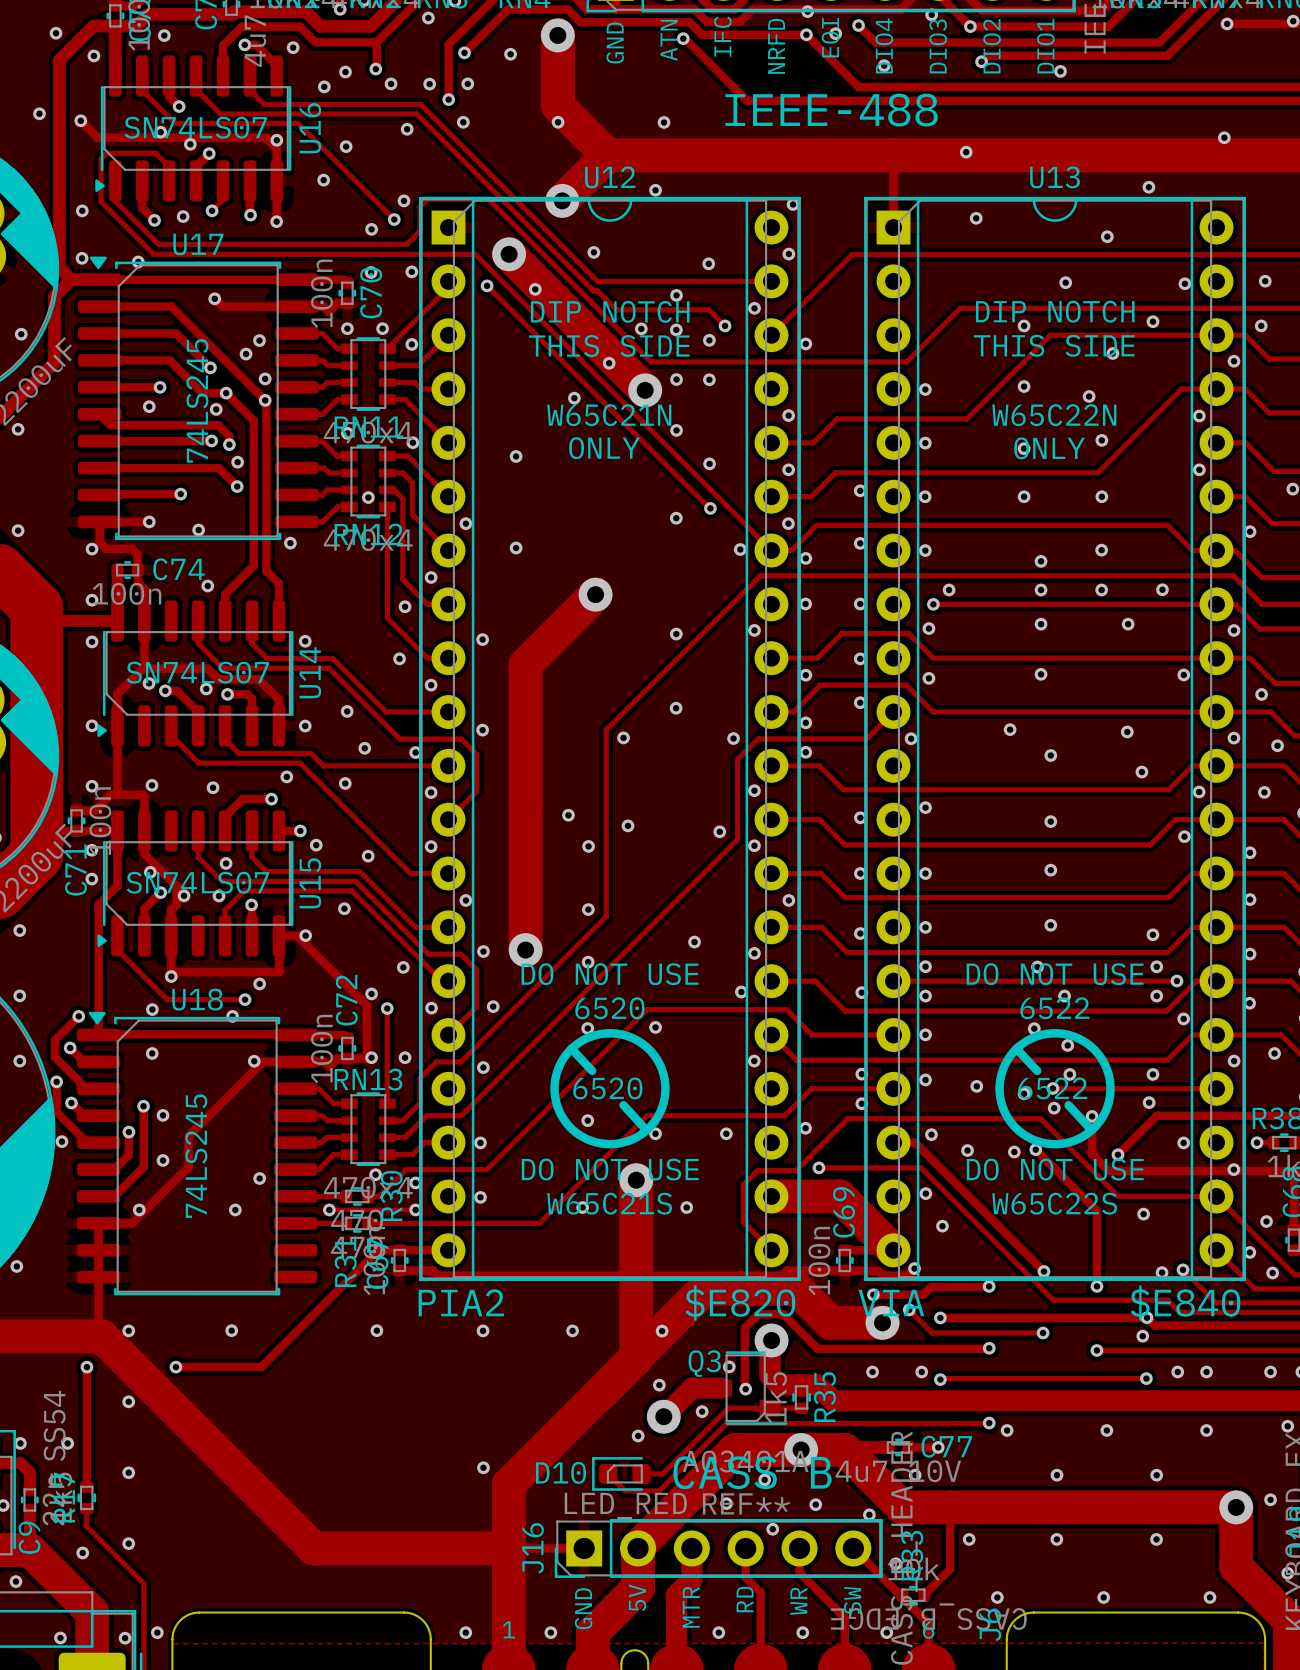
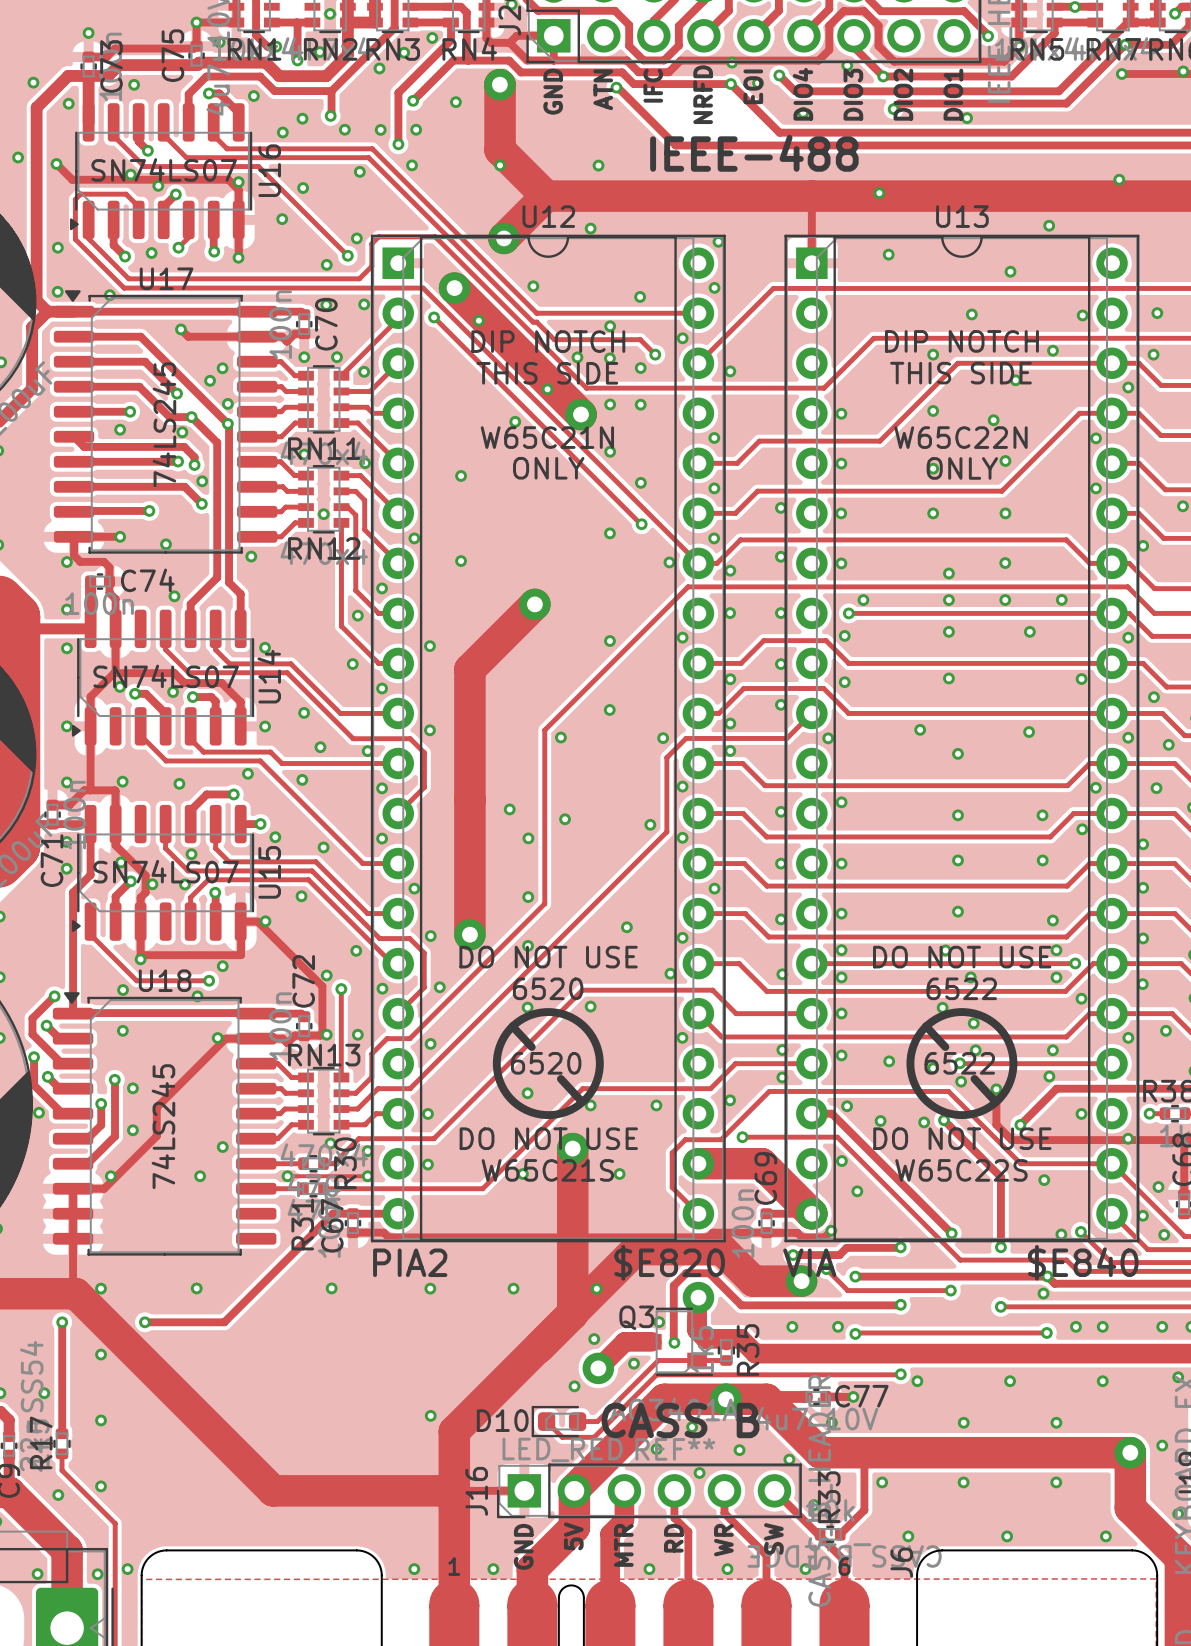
via: (1141, 772) -> none
via: none -> (1042, 815)
via: none -> (1042, 860)

